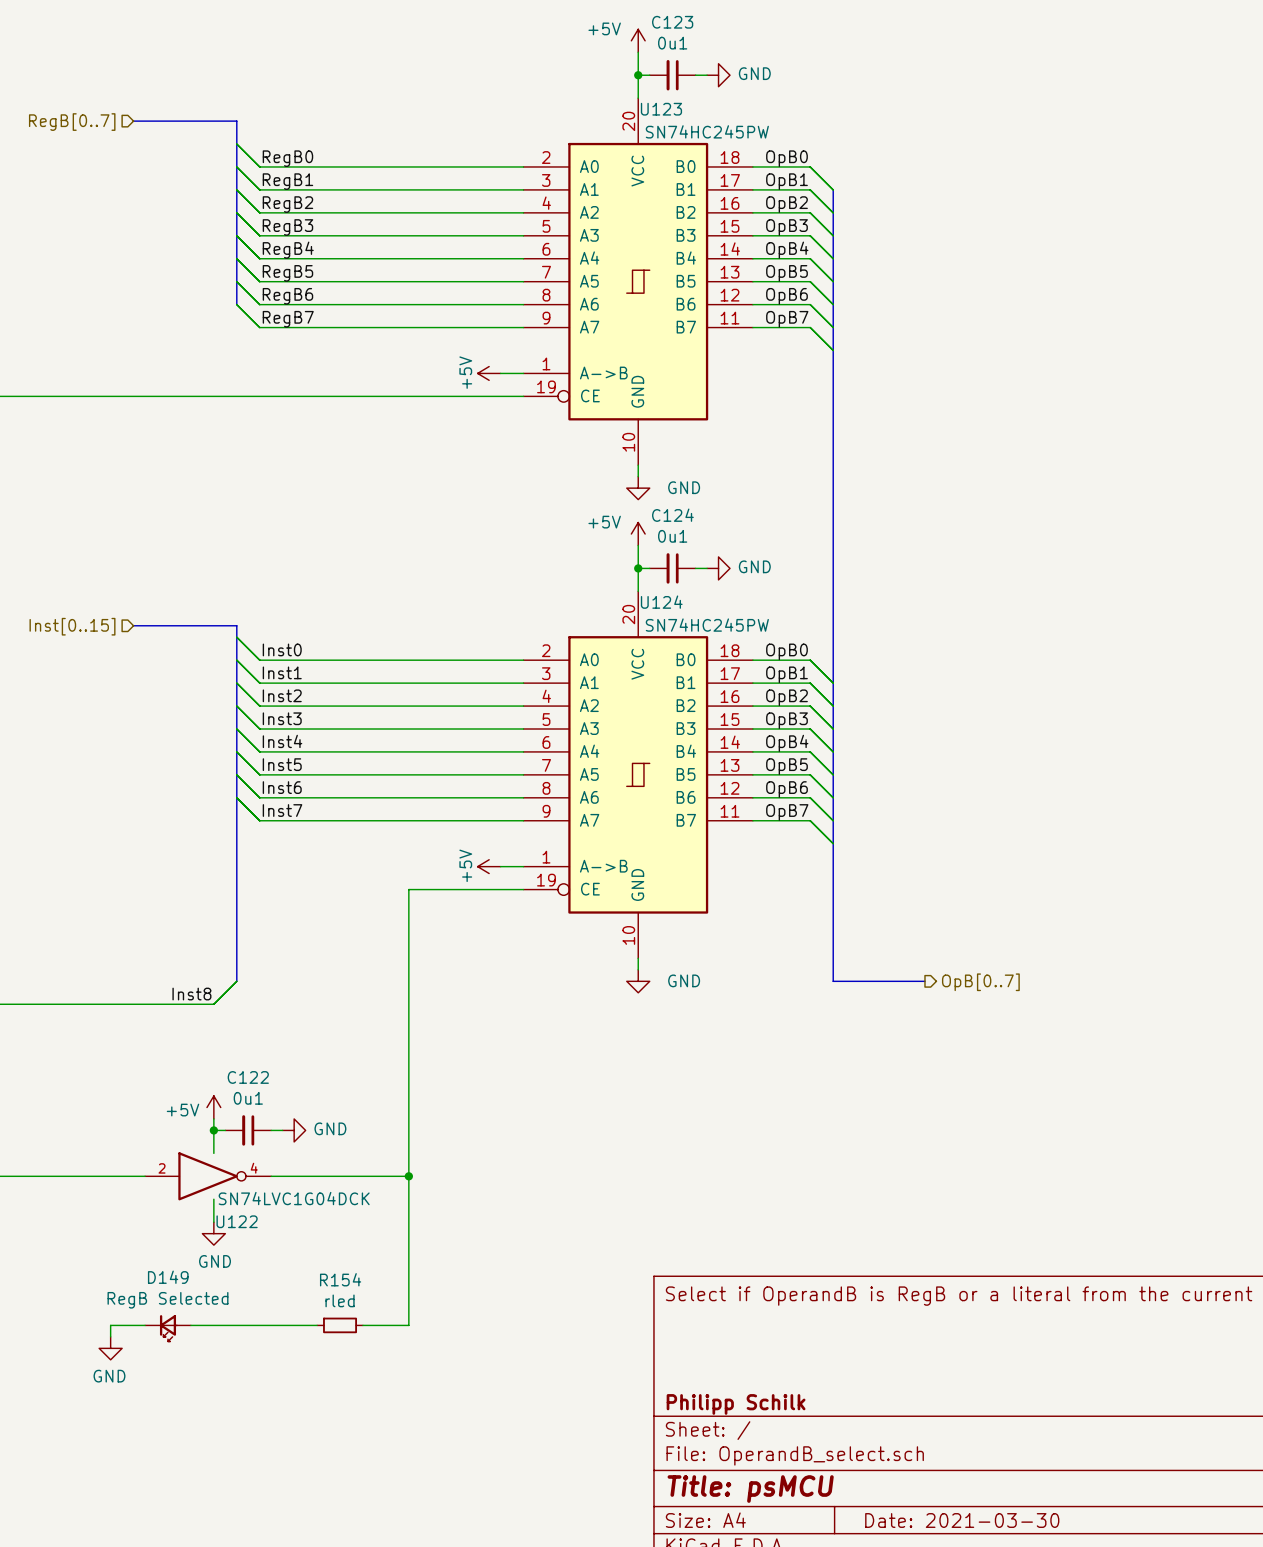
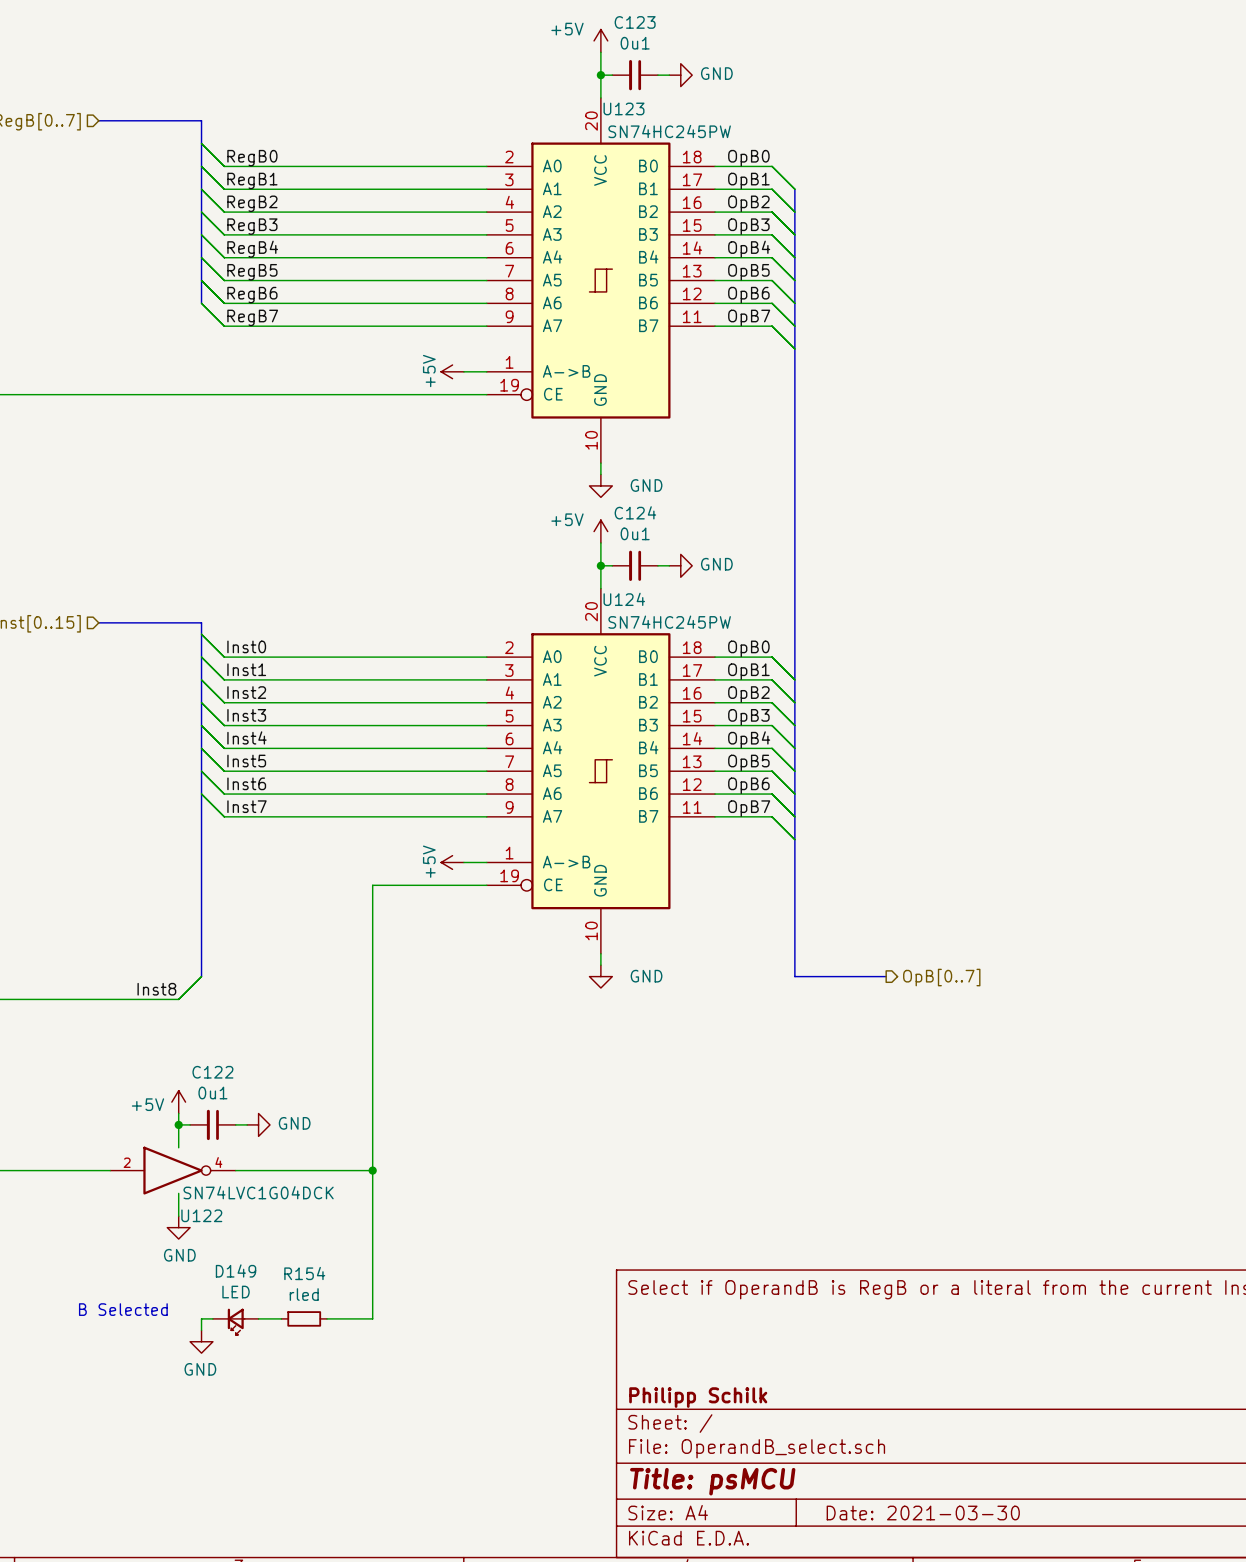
D149 value: RegB Selected (167, 1300) -> LED (236, 1292)
text: none -> B Selected (123, 1309)
wire: (145, 1325) (110, 1325) (110, 1336) -> none
wire: (190, 1325) (236, 1325) -> (201, 1330) (201, 1318)
D149 position: (167, 1328) -> (235, 1321)
power symbol position: GND (110, 1348) -> GND (201, 1341)

